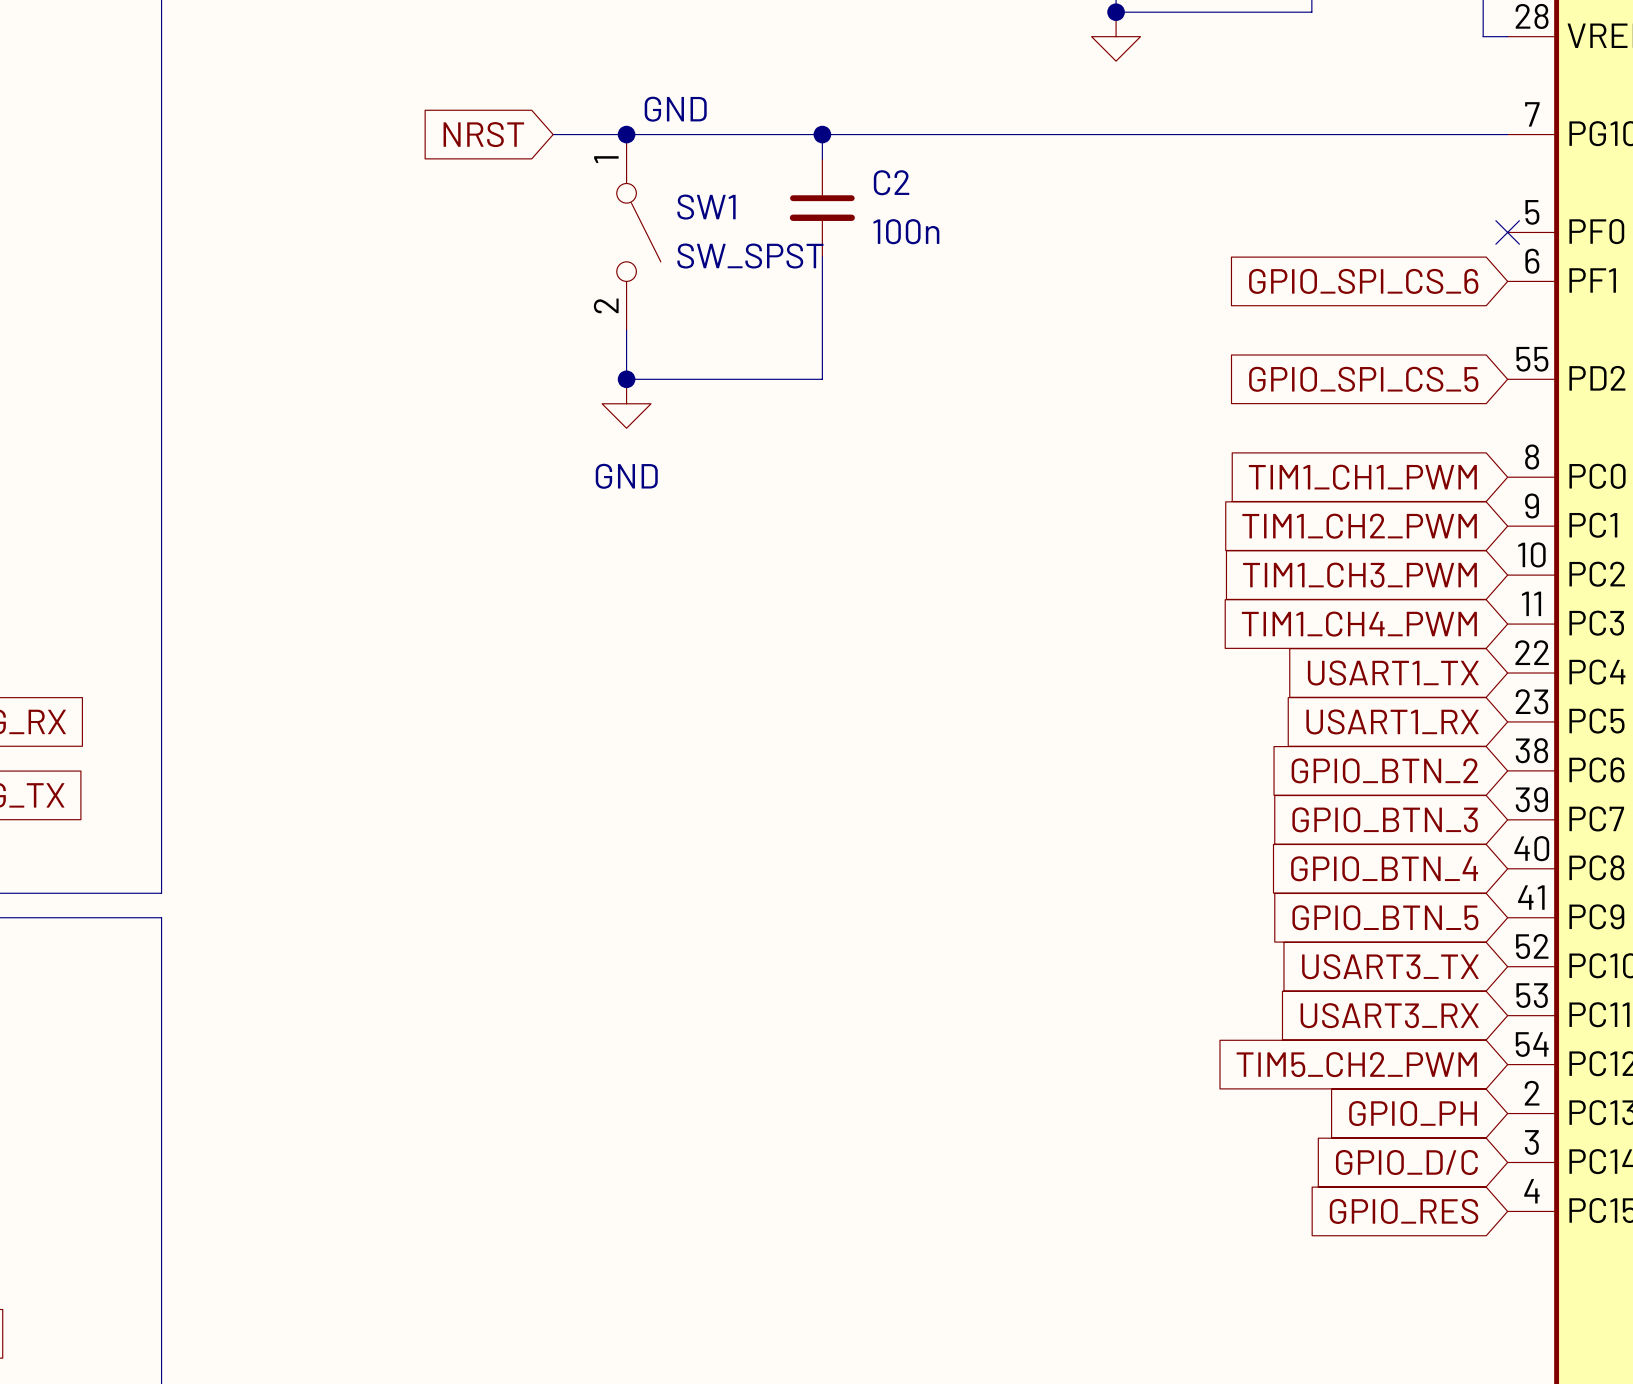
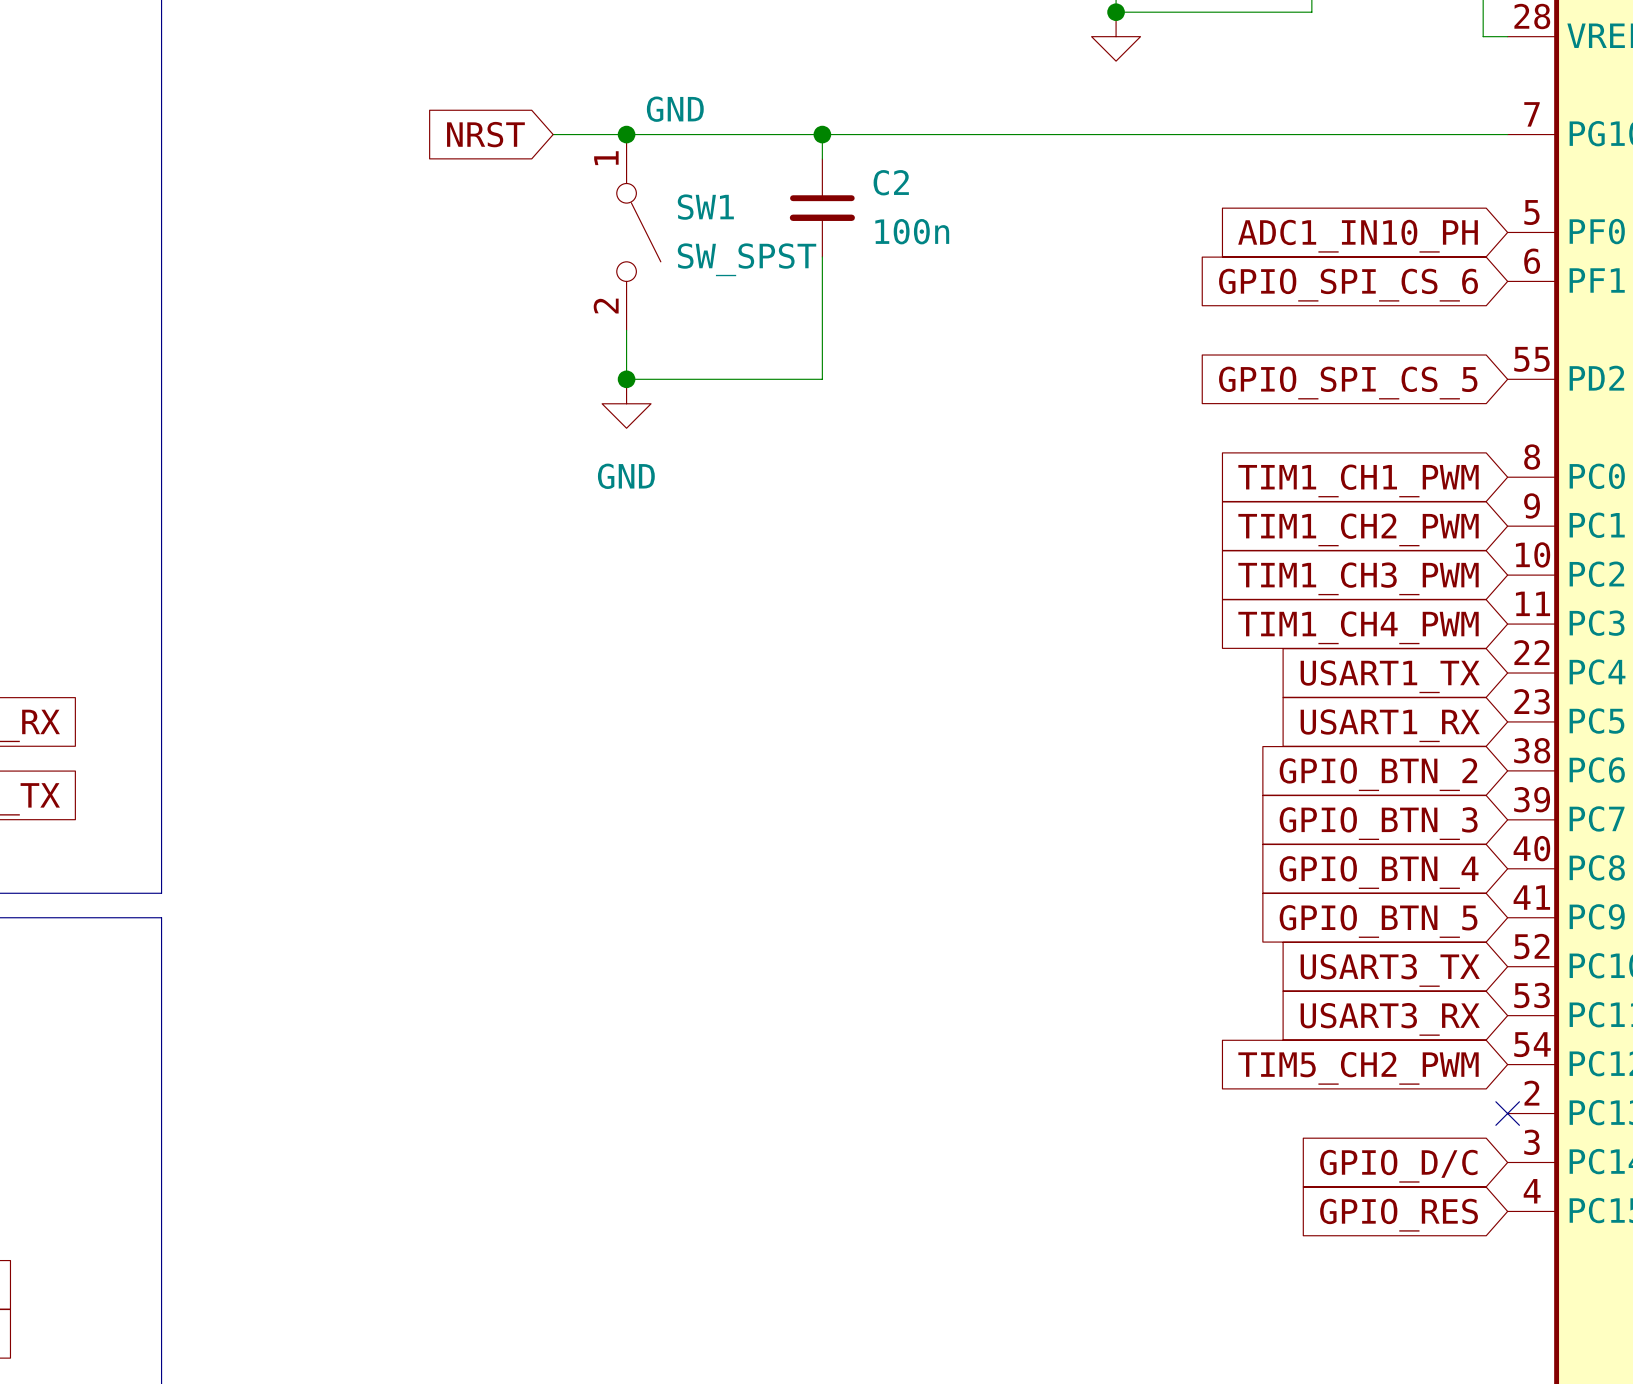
global label: none -> ADC1_IN10_PH (1358, 236)
no-connect mark: (1507, 232) -> none
global label: GPIO_PH (1413, 1113) -> none
no-connect mark: none -> (1507, 1113)

